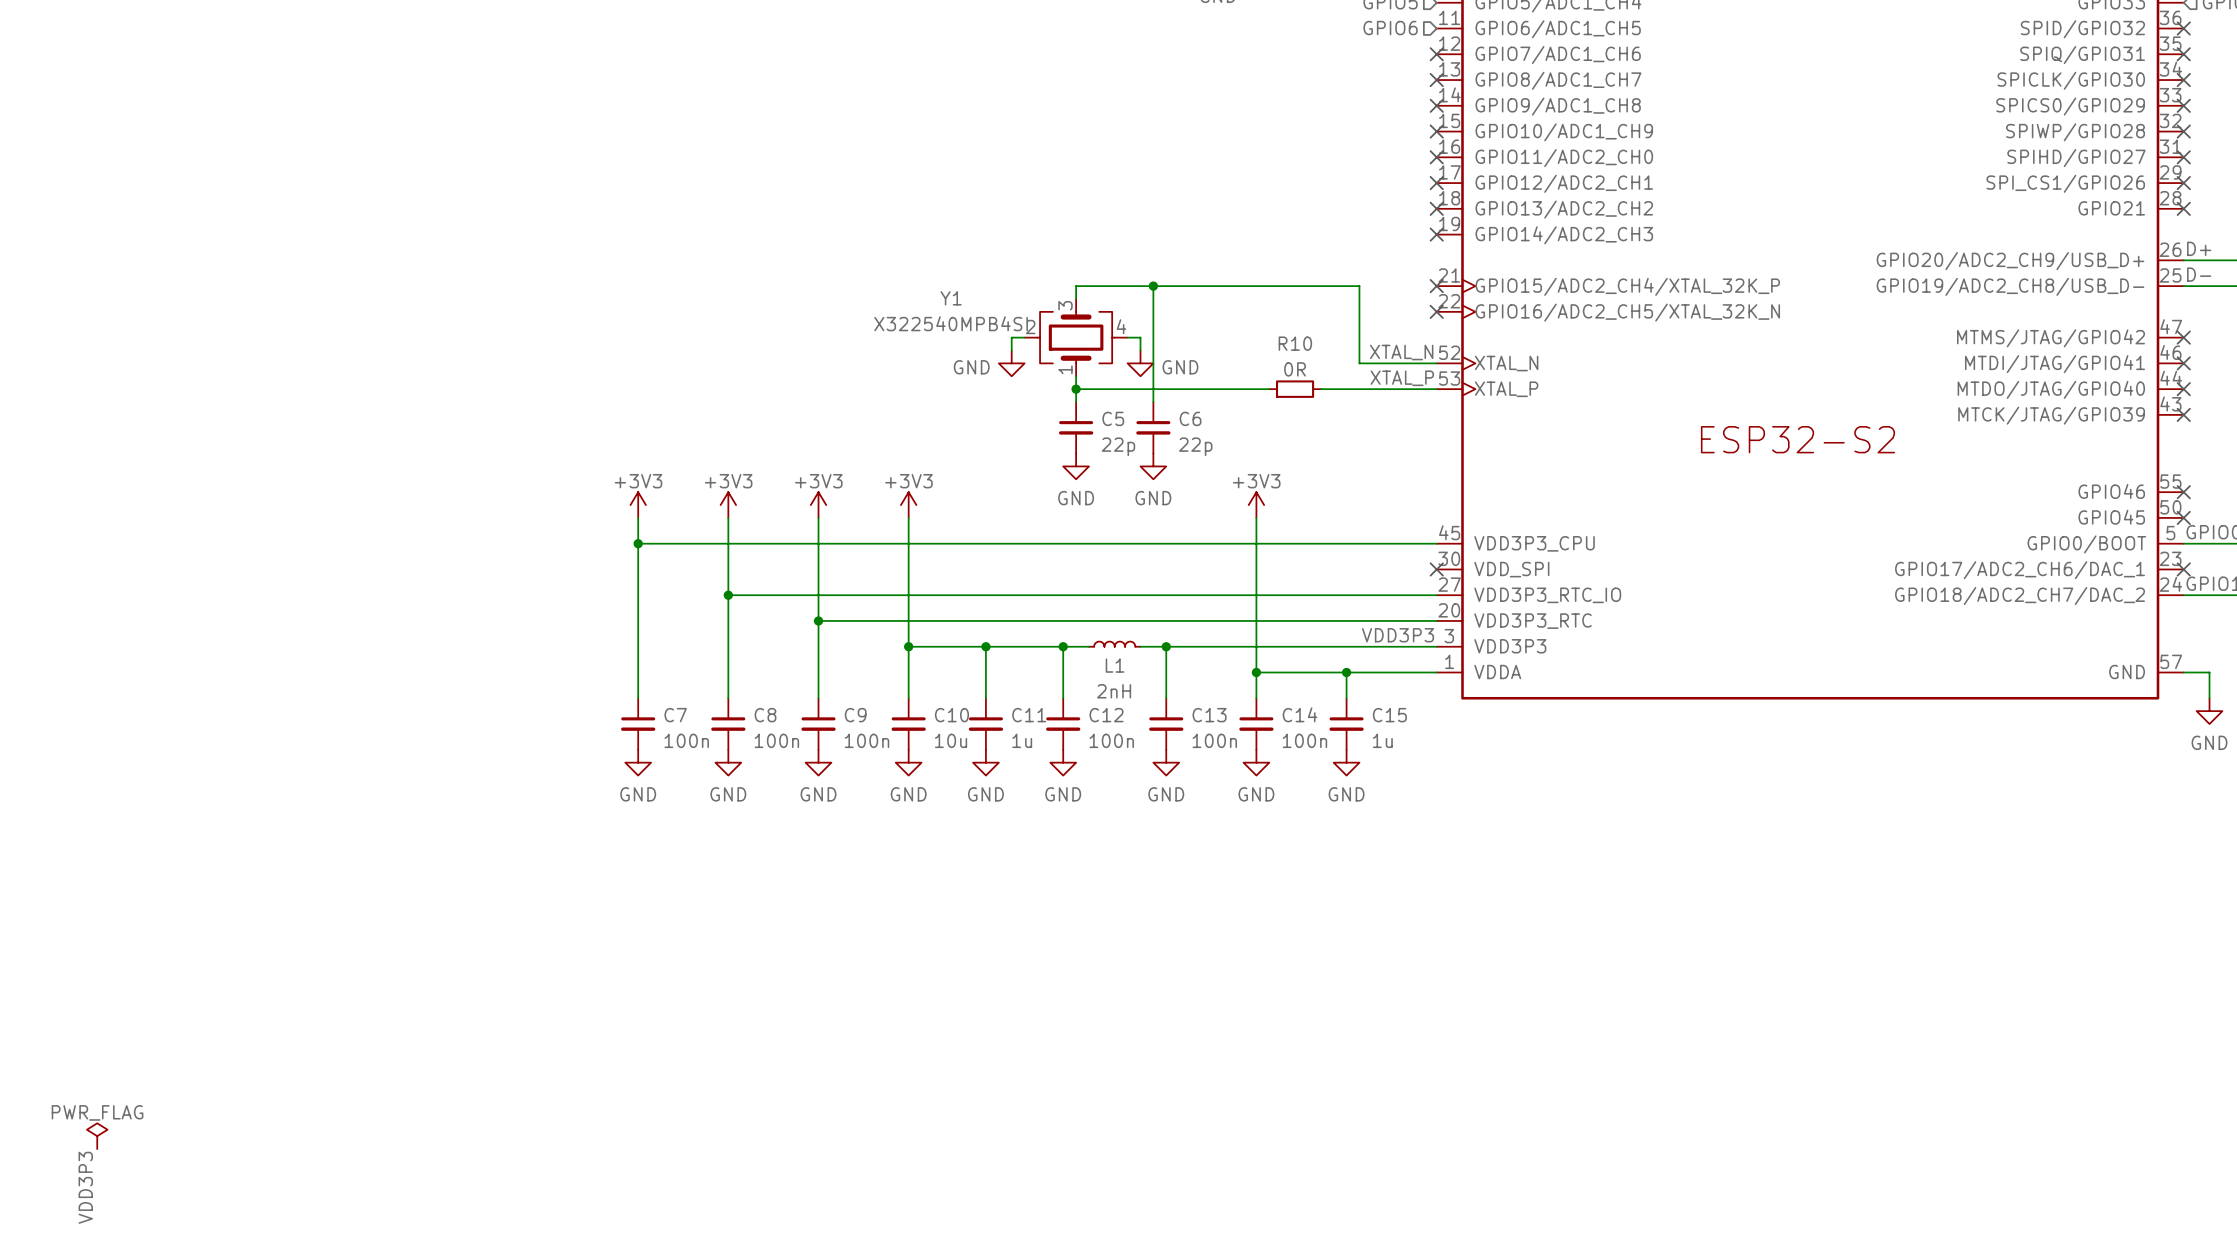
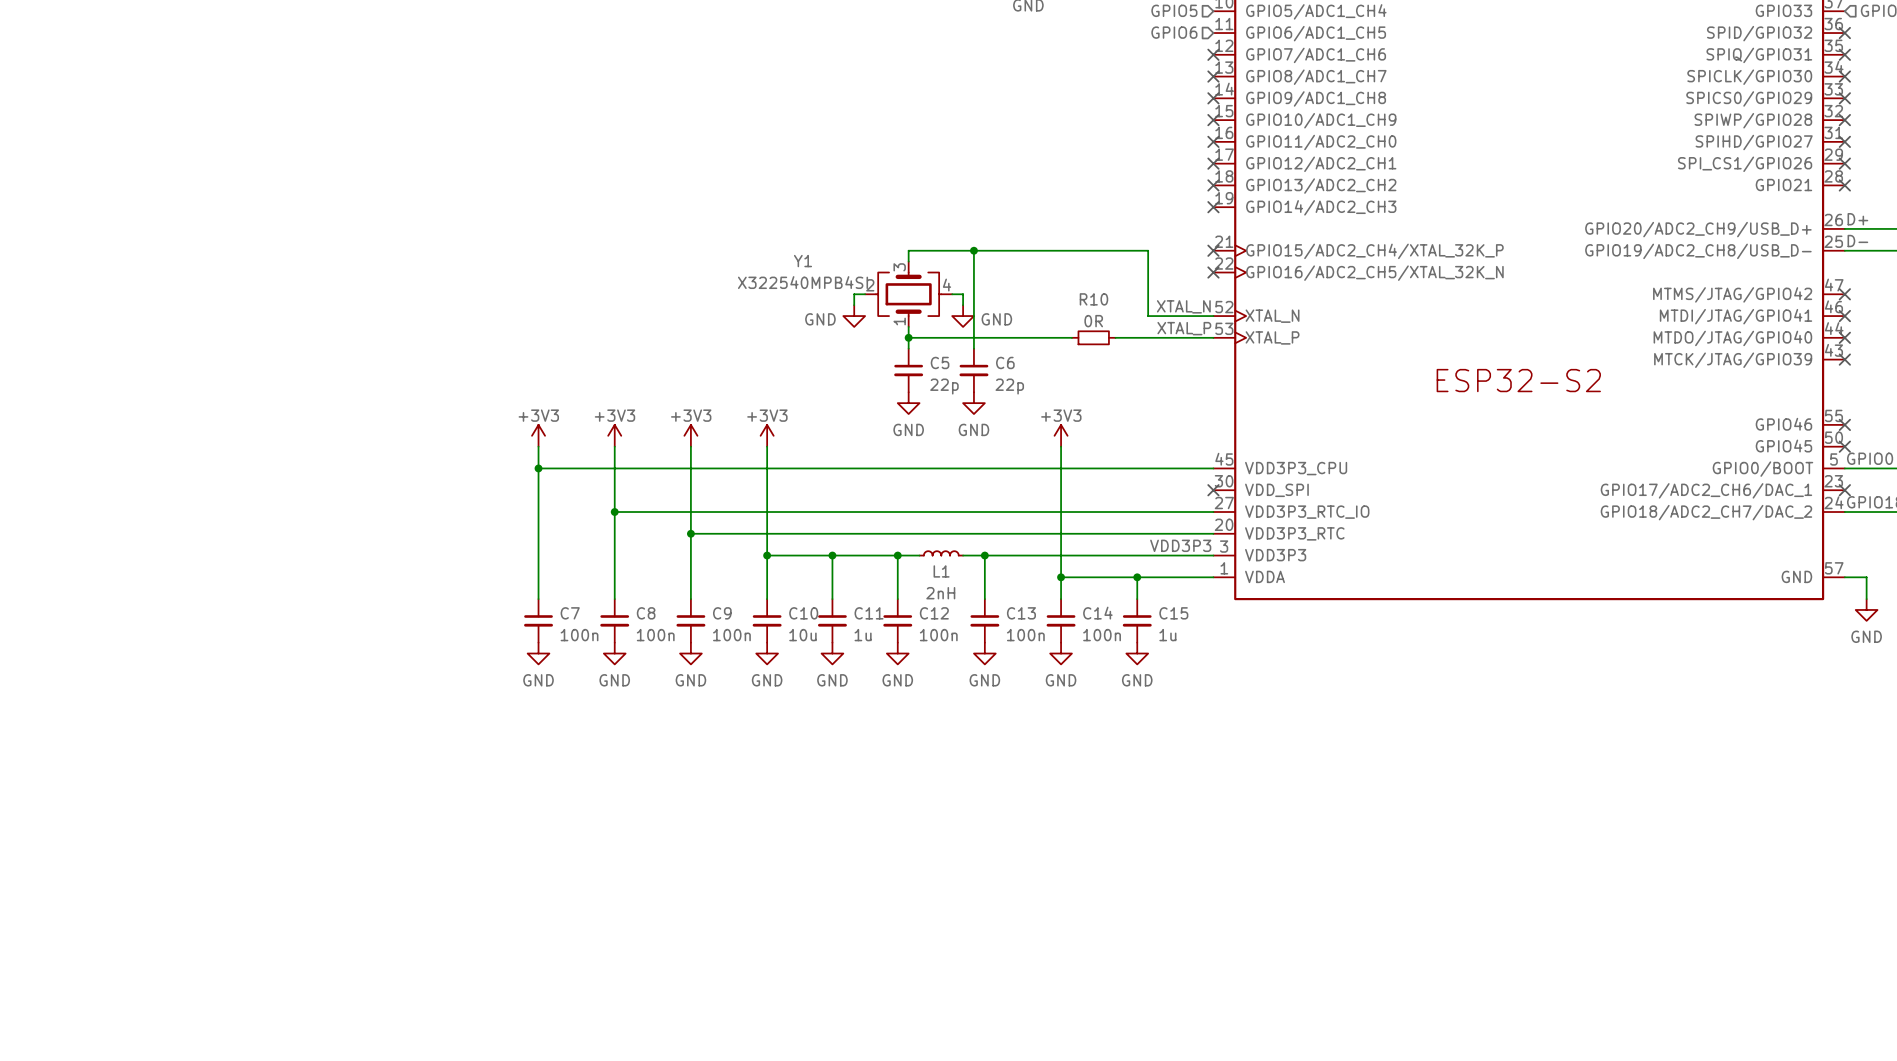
power symbol: PWR_FLAG (97, 1136) -> none
label: VDD3P3 (85, 1187) -> none

